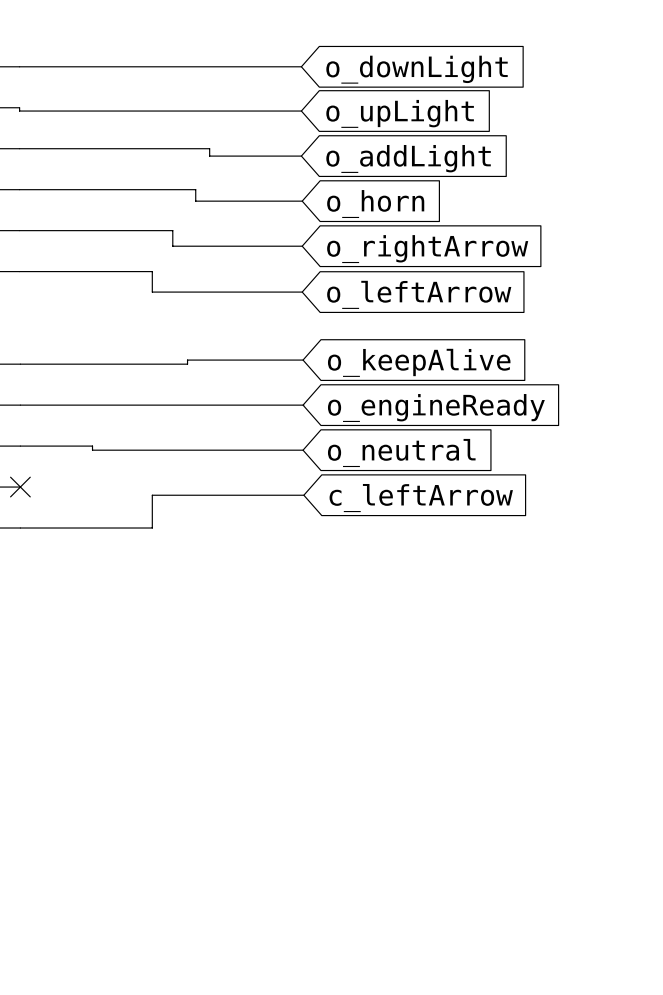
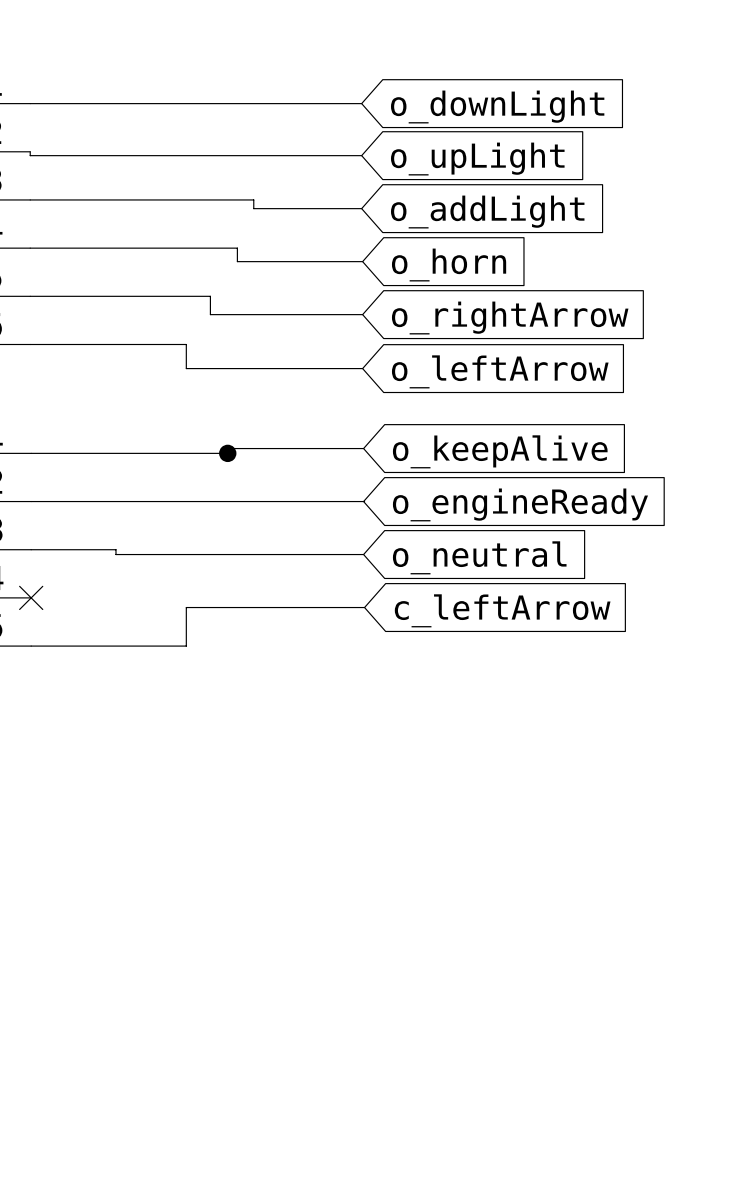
junction: none -> (227, 453)

